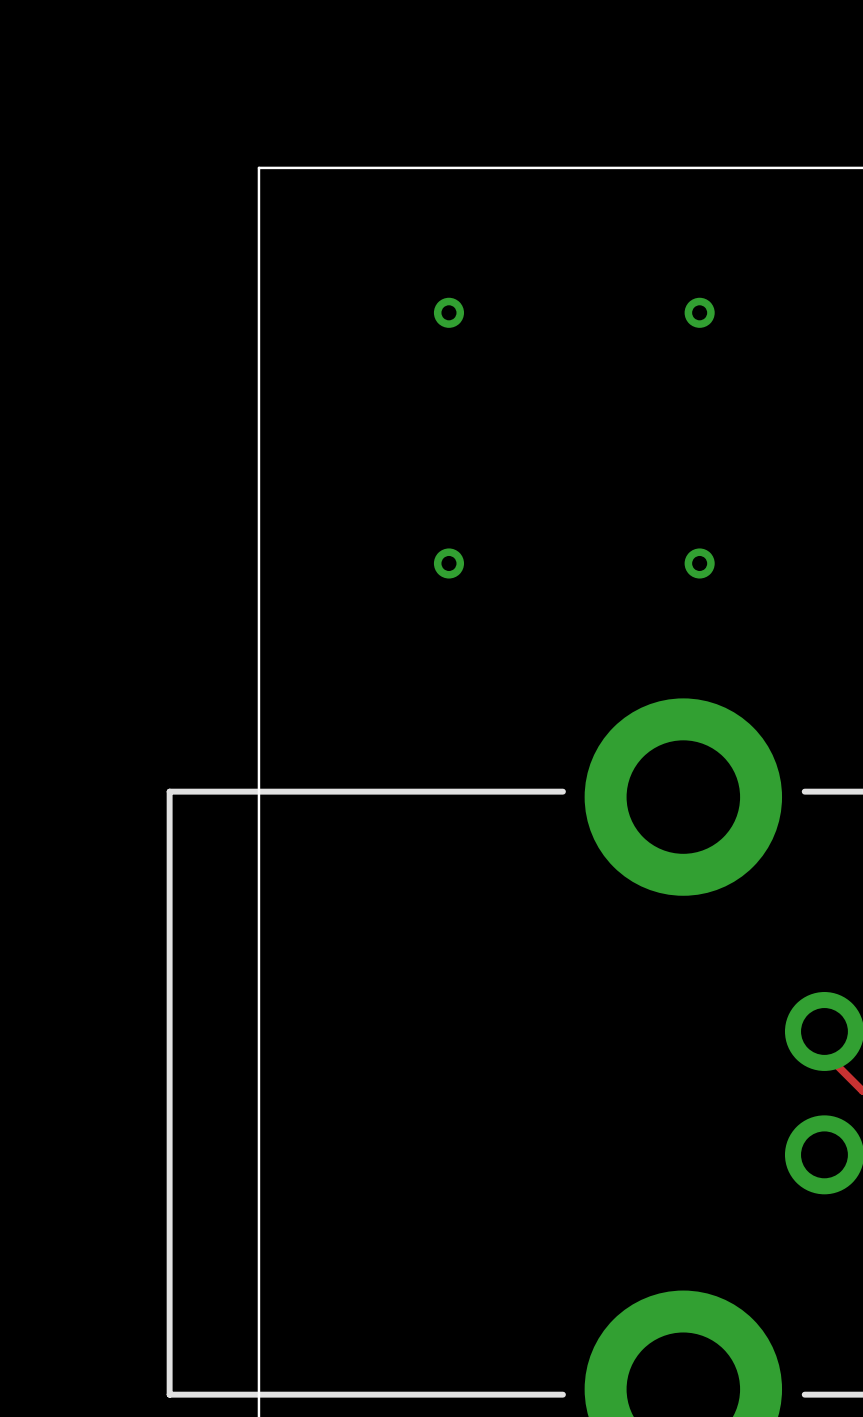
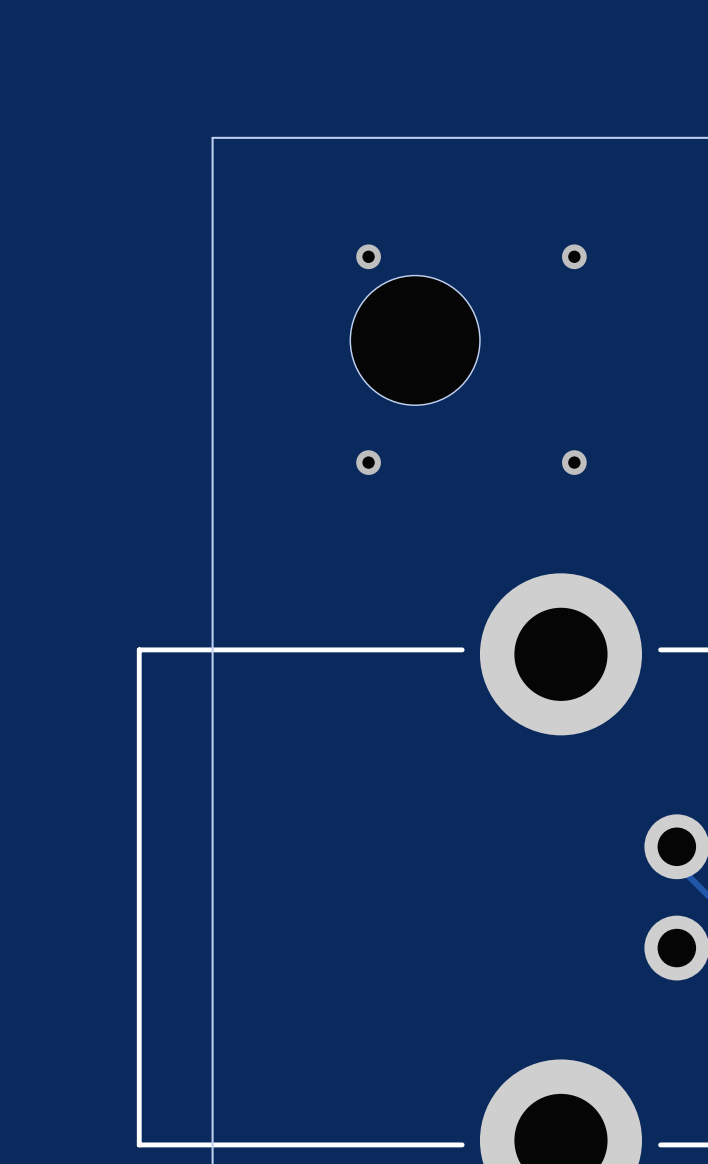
part: none -> (415, 340)

